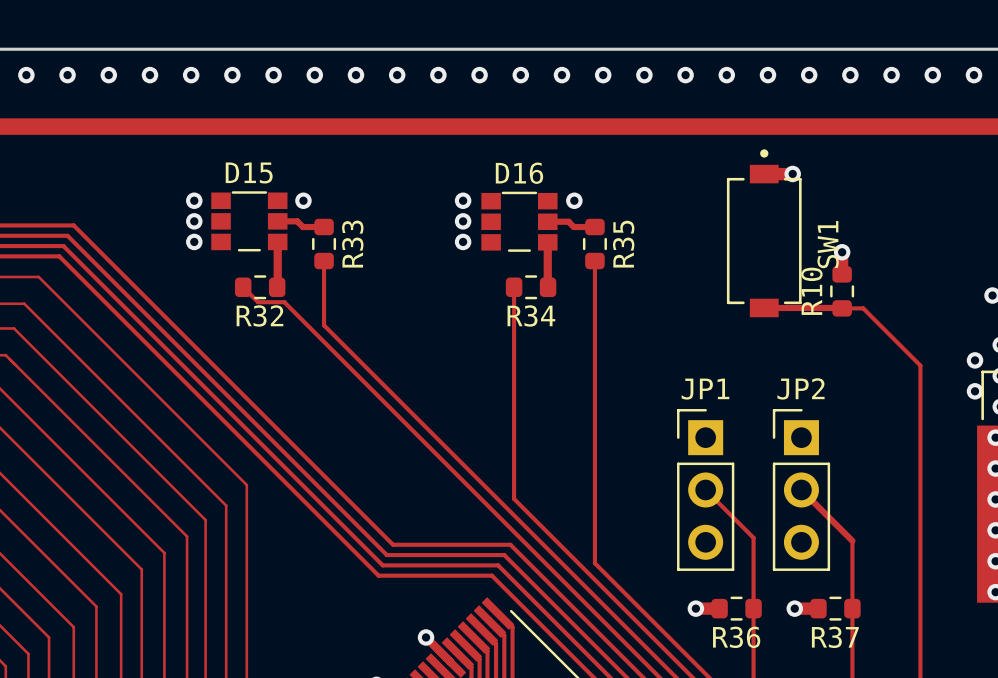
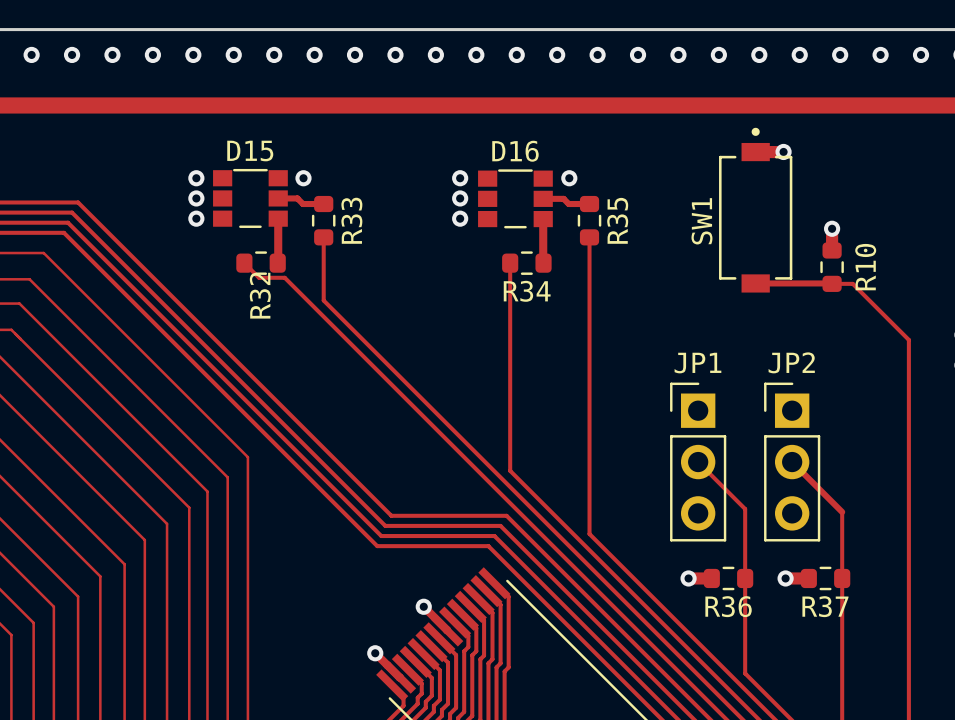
SW1 name position: SW1 (828, 244) -> SW1 (701, 221)
R10 name position: R10 (811, 291) -> R10 (865, 267)
R32 name rotation: 0° (259, 315) -> 90° counterclockwise (260, 295)

